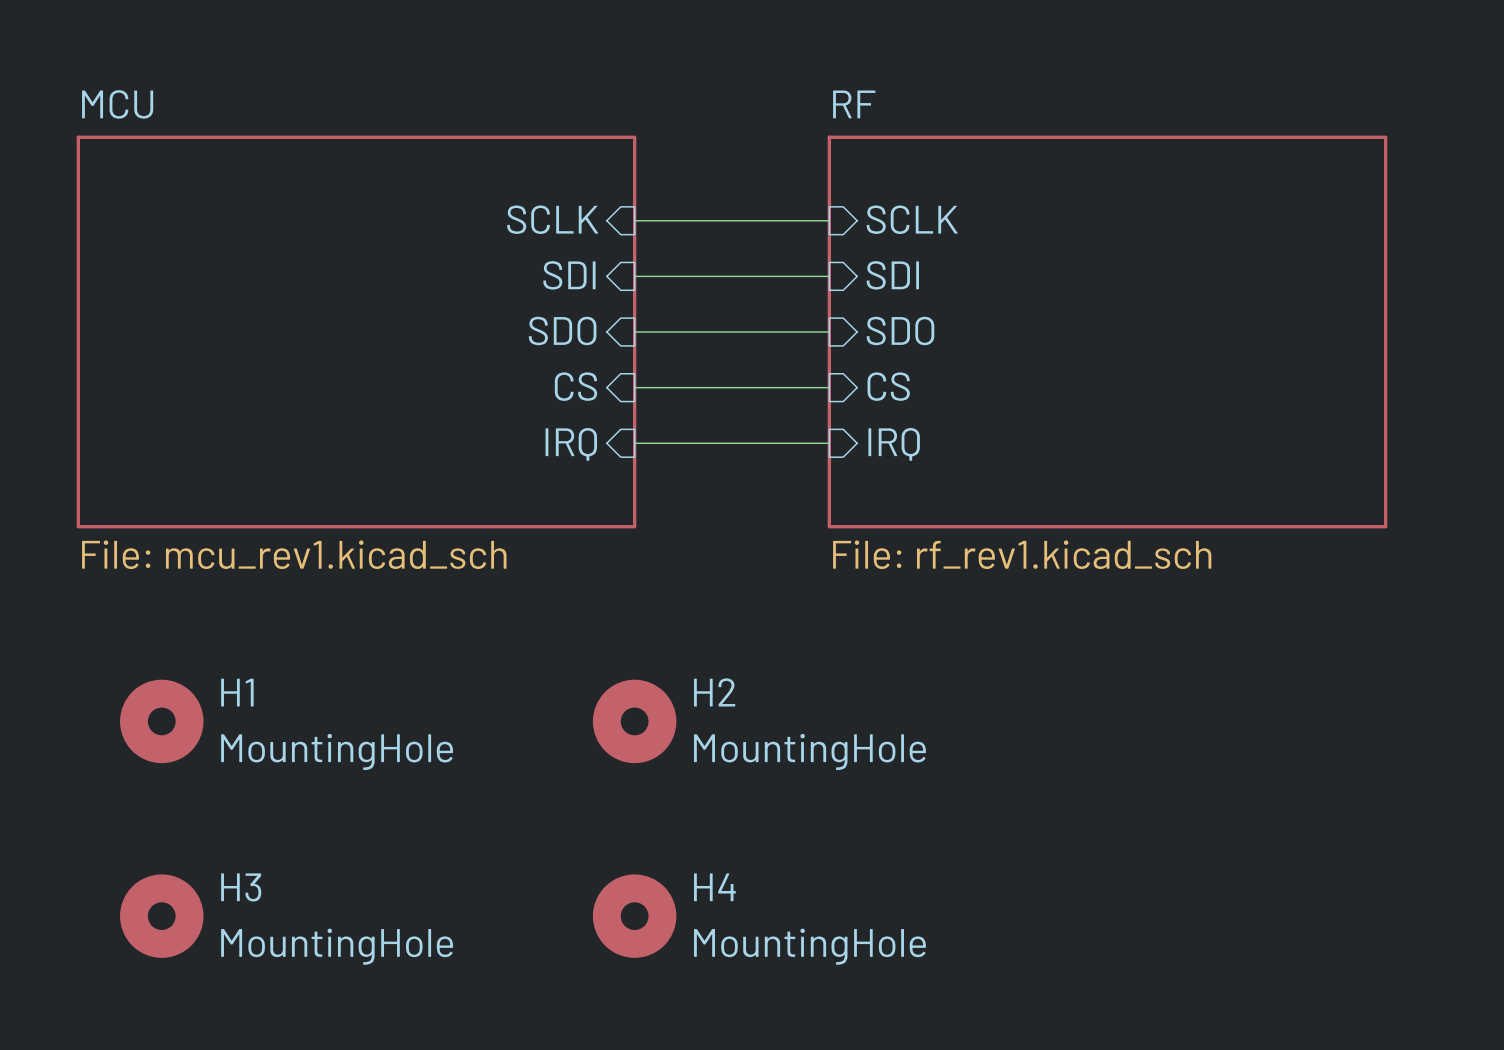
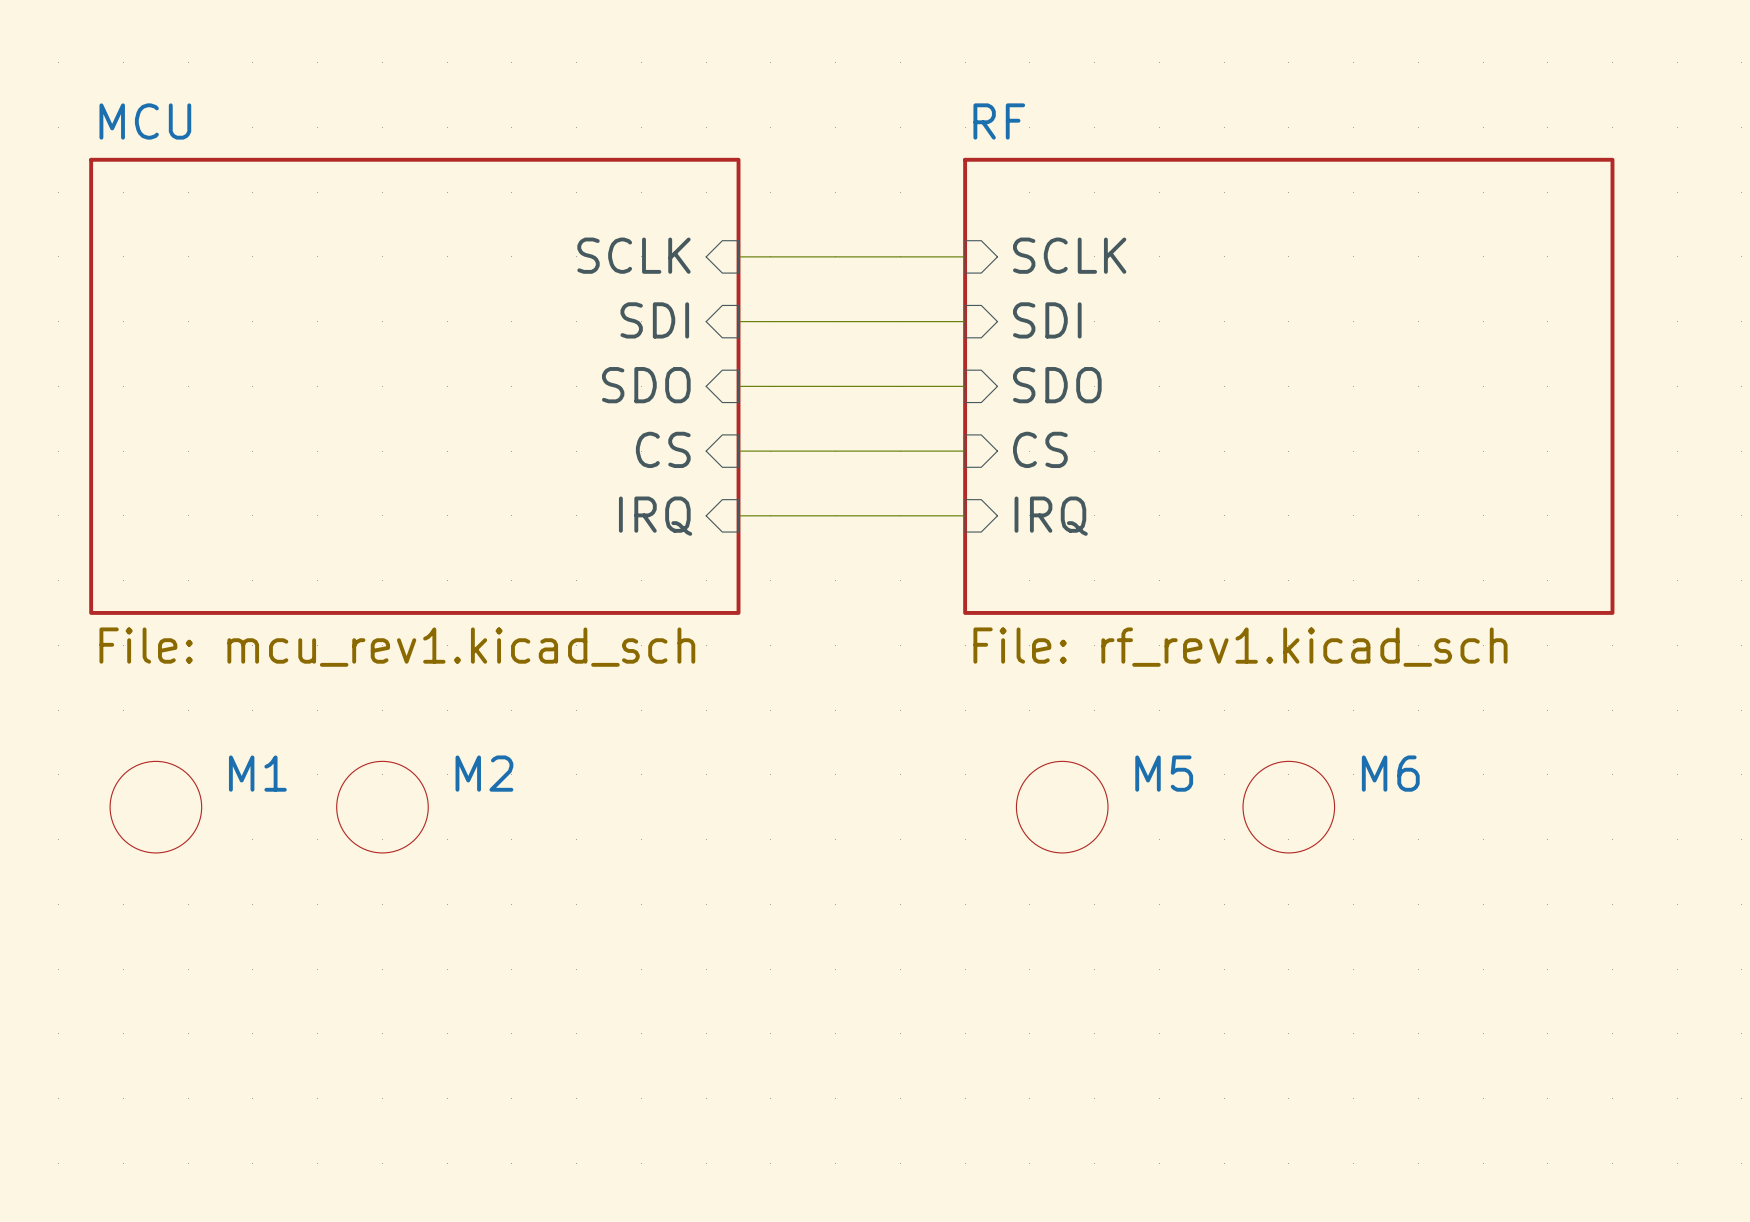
M1: none -> (155, 807)
M2: none -> (382, 807)
M5: none -> (1062, 807)
M6: none -> (1288, 807)
H1: MountingHole (161, 721) -> none
H2: MountingHole (634, 721) -> none
H3: MountingHole (161, 916) -> none
H4: MountingHole (634, 916) -> none

